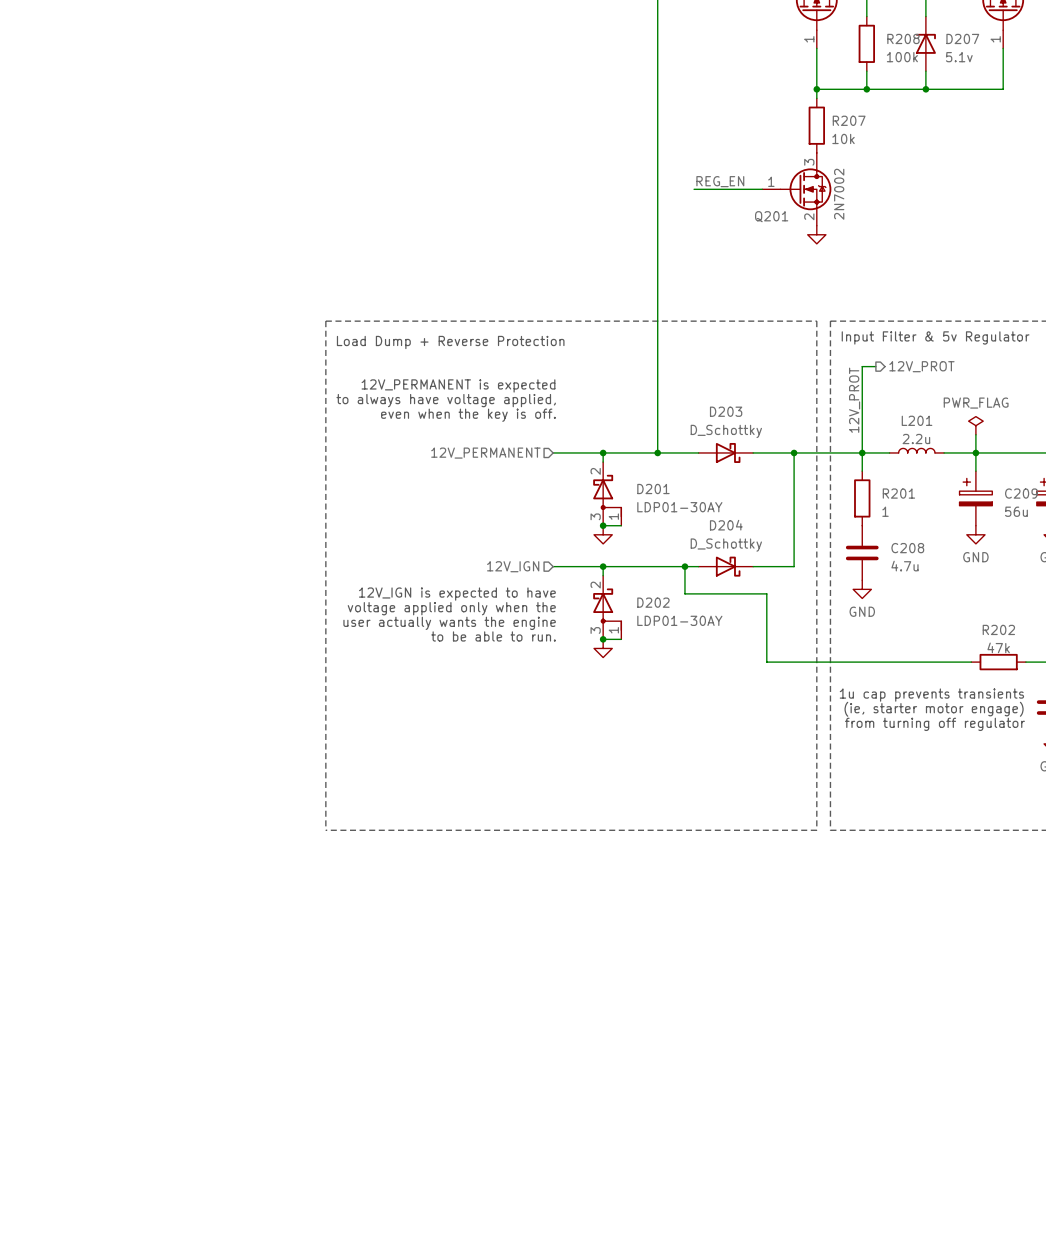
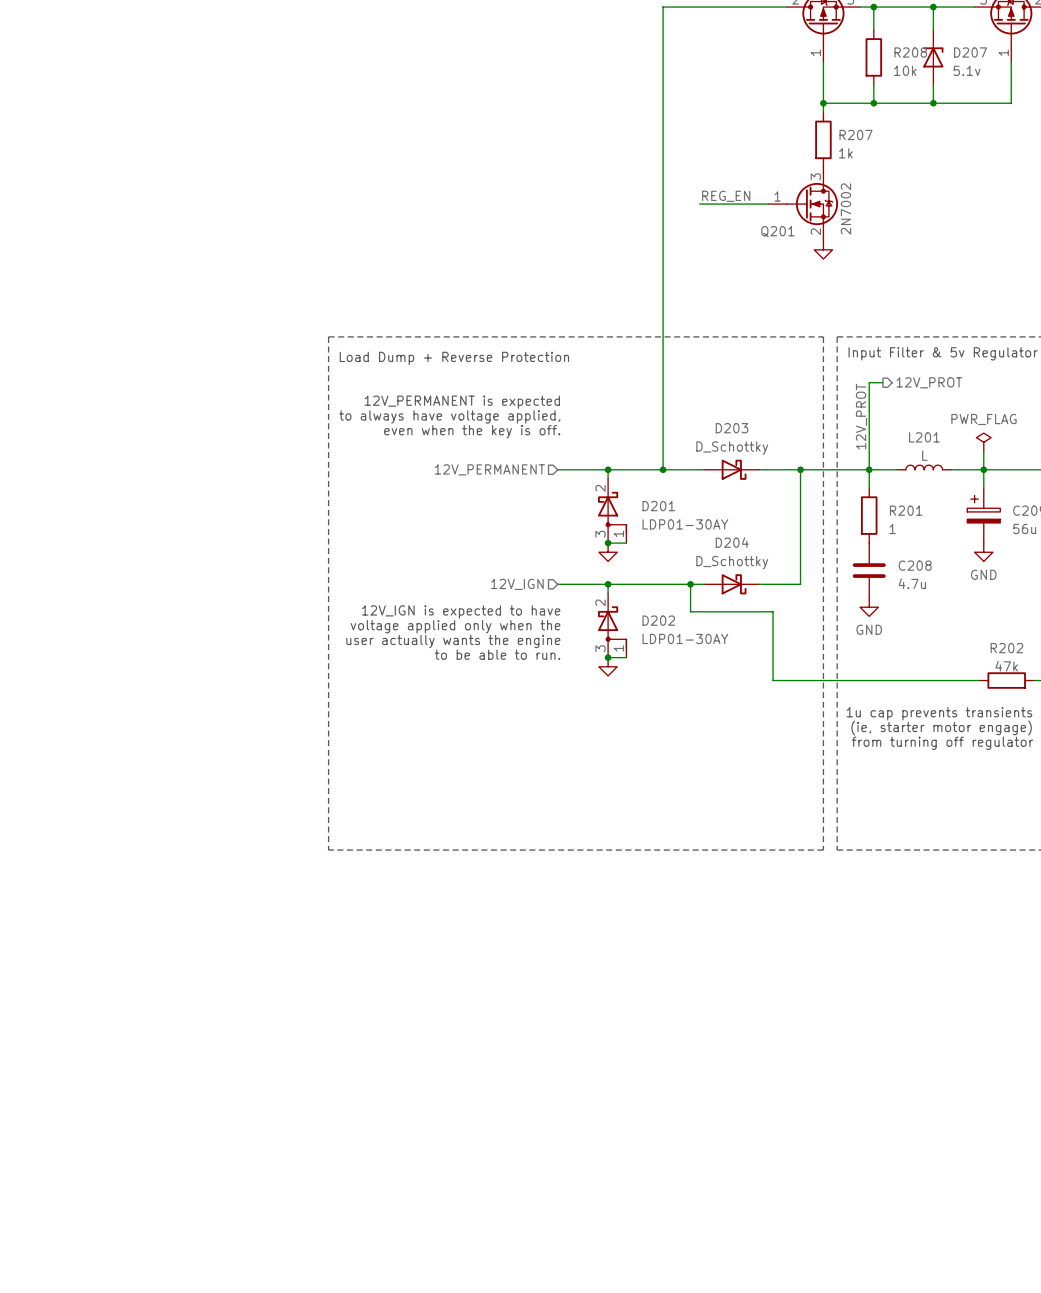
R208 value: 100k (902, 57) -> 10k (905, 70)
R207 value: 10k (843, 138) -> 1k (845, 153)
L201 value: 2.2u (916, 439) -> L (924, 455)

